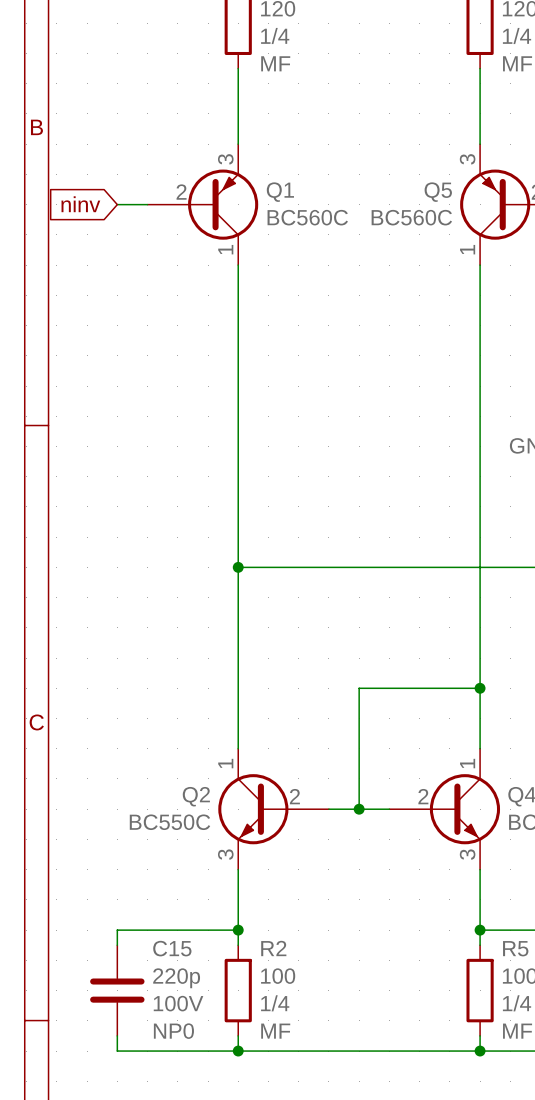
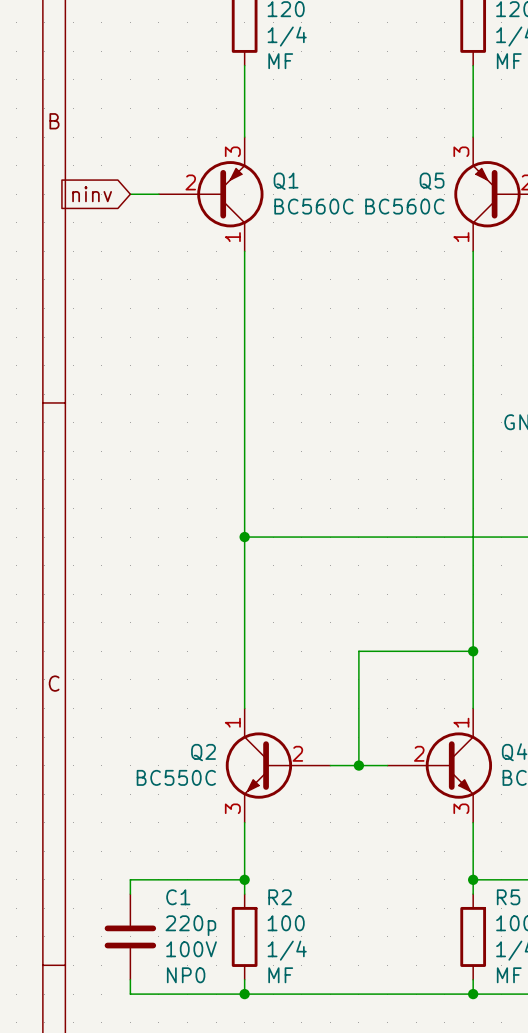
C15 name: C15 (172, 948) -> C1 (178, 897)

